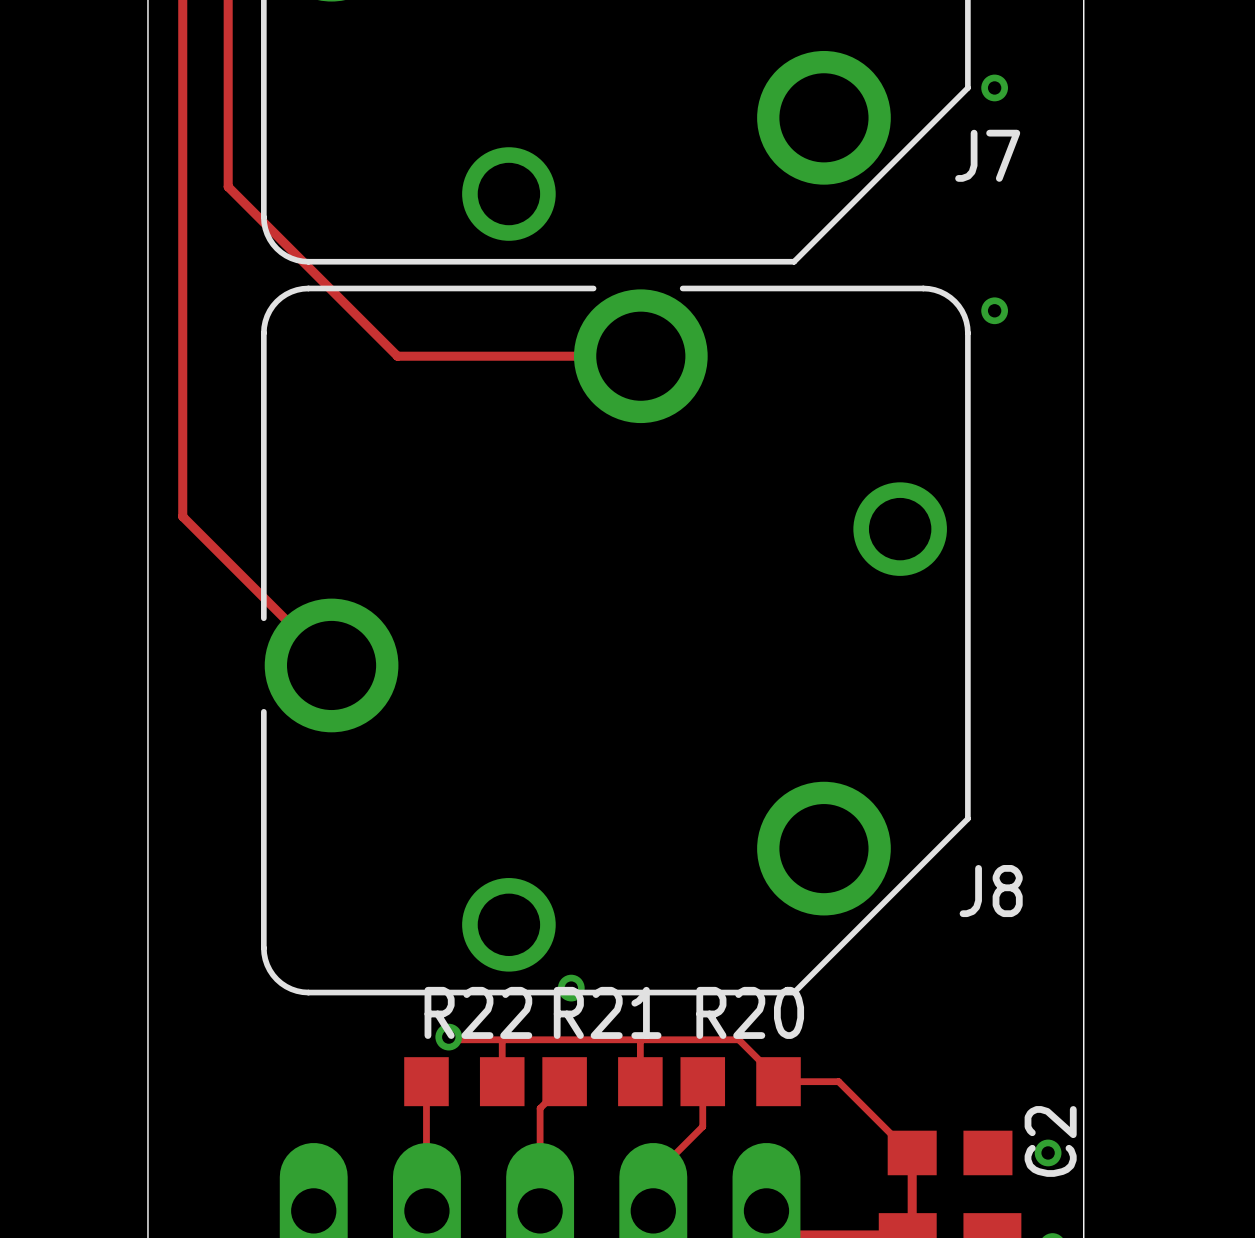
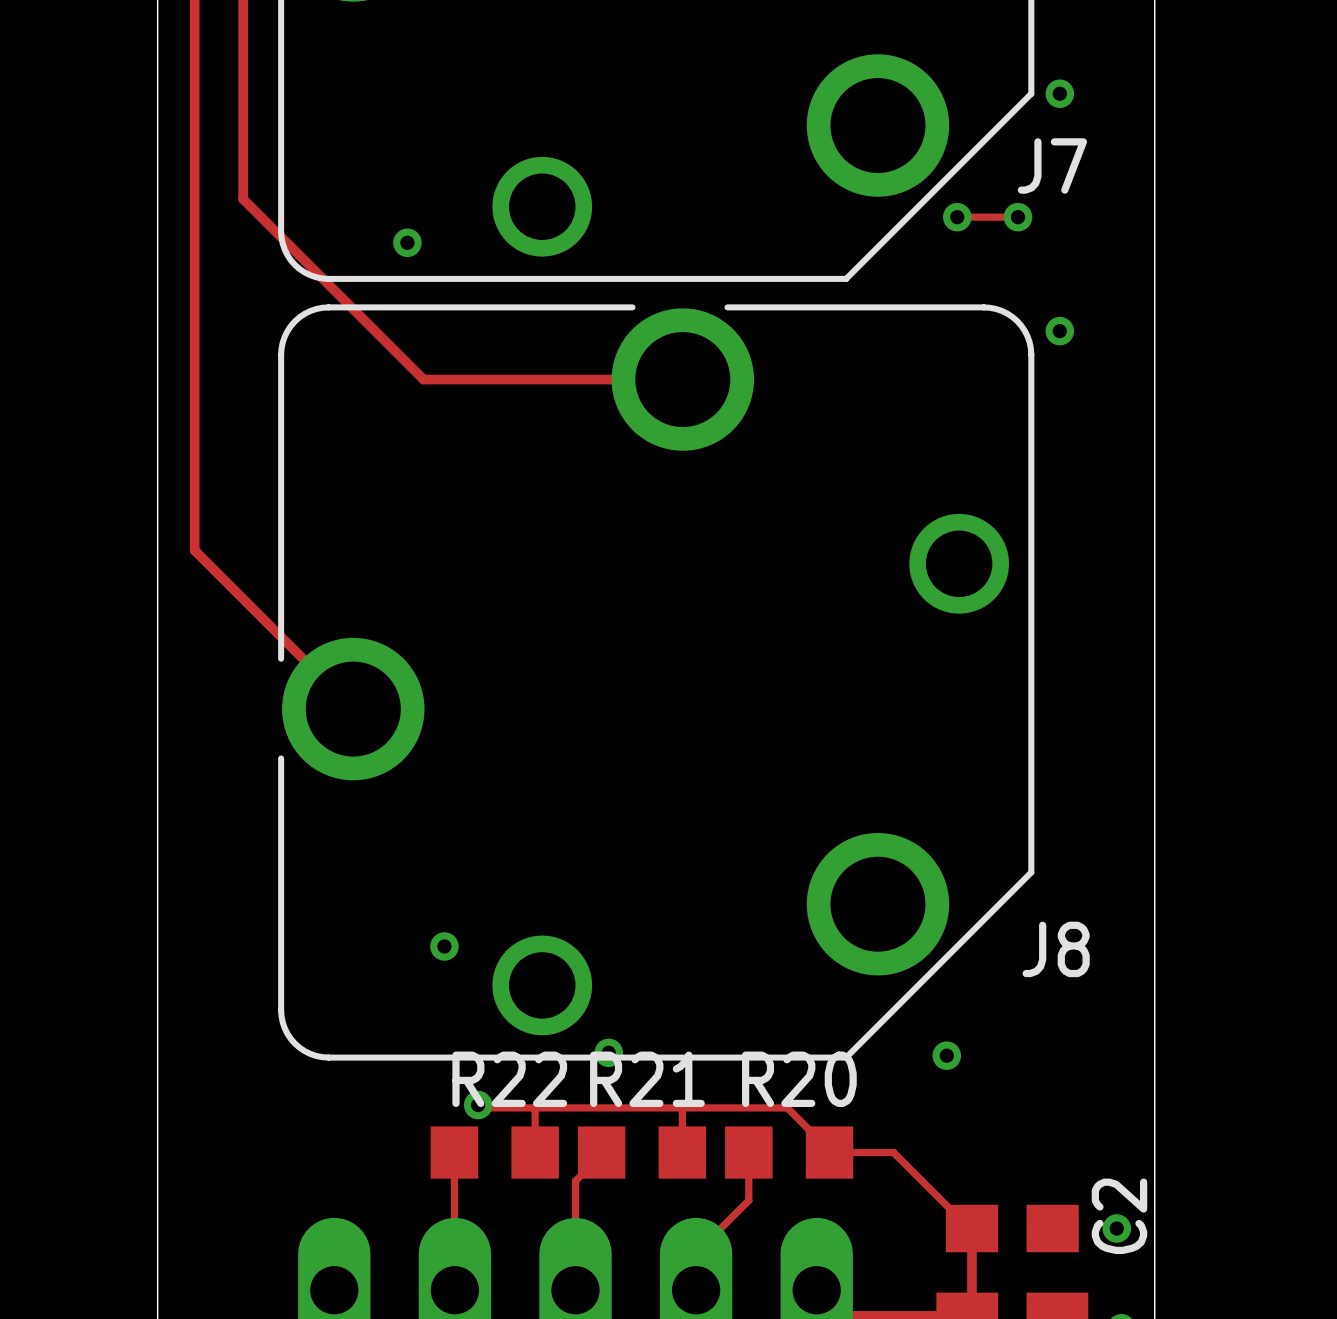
track: none -> (957, 217) (1018, 217)
via: none -> (957, 217)
via: none -> (1018, 217)
via: none -> (407, 242)
via: none -> (444, 946)
via: none -> (946, 1055)

